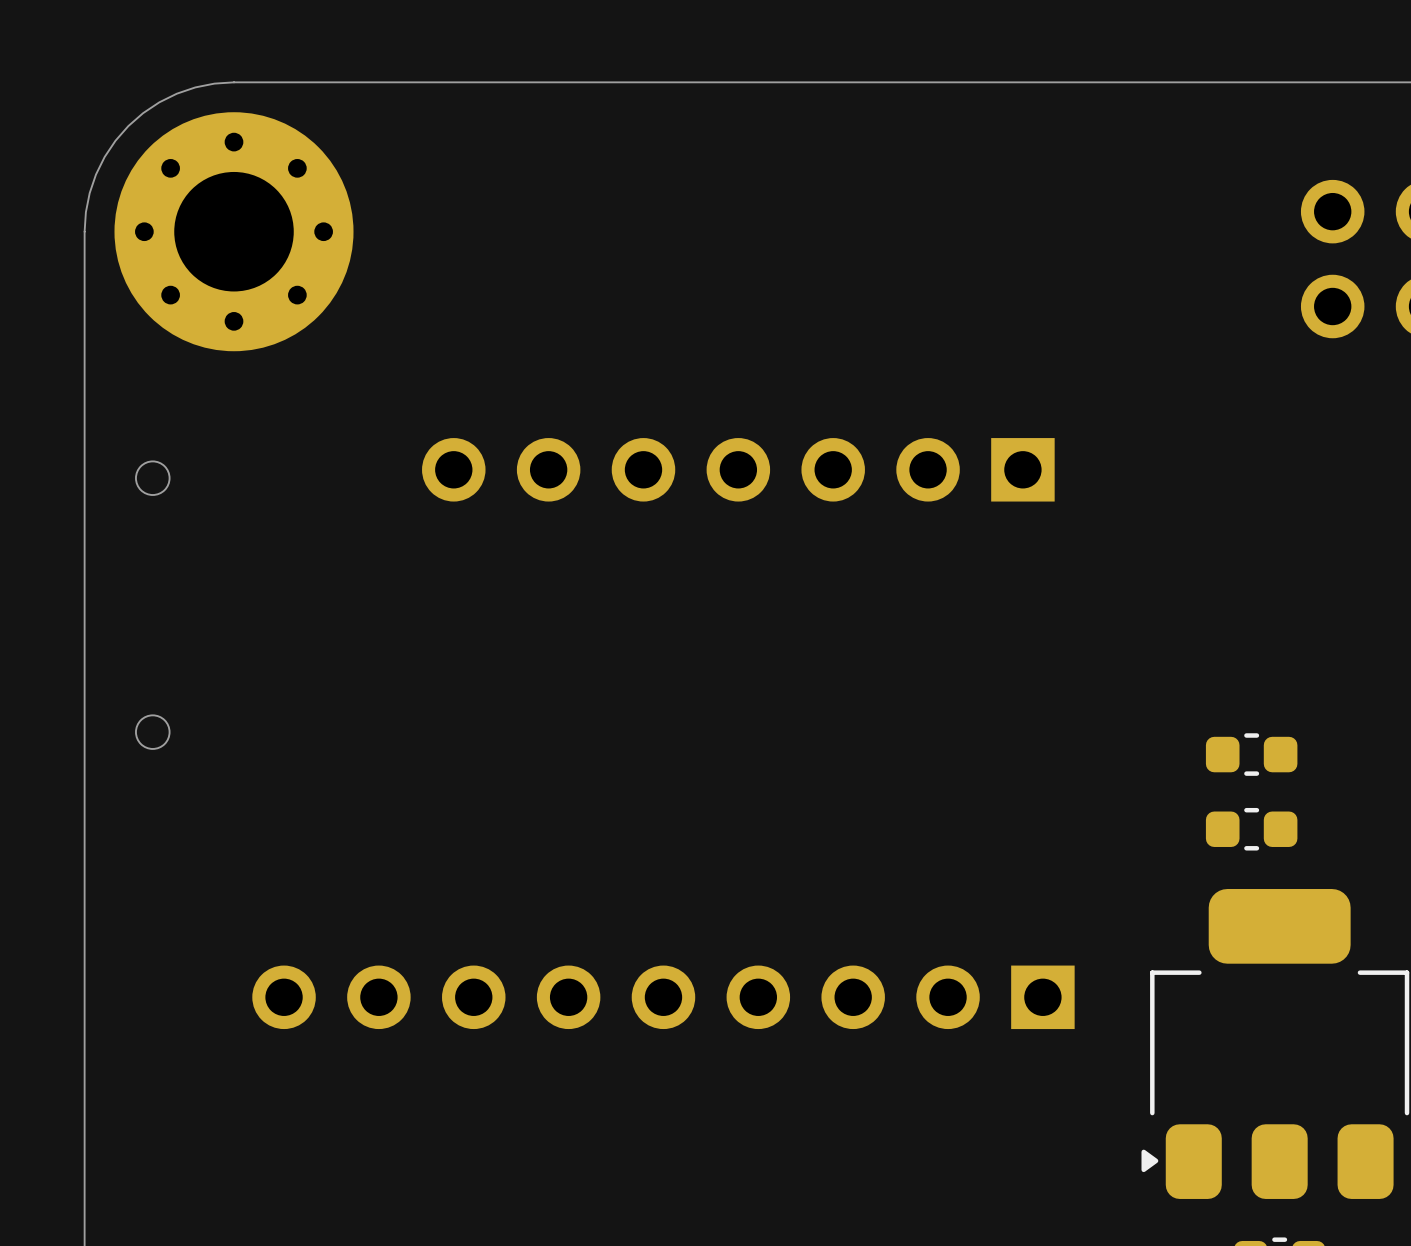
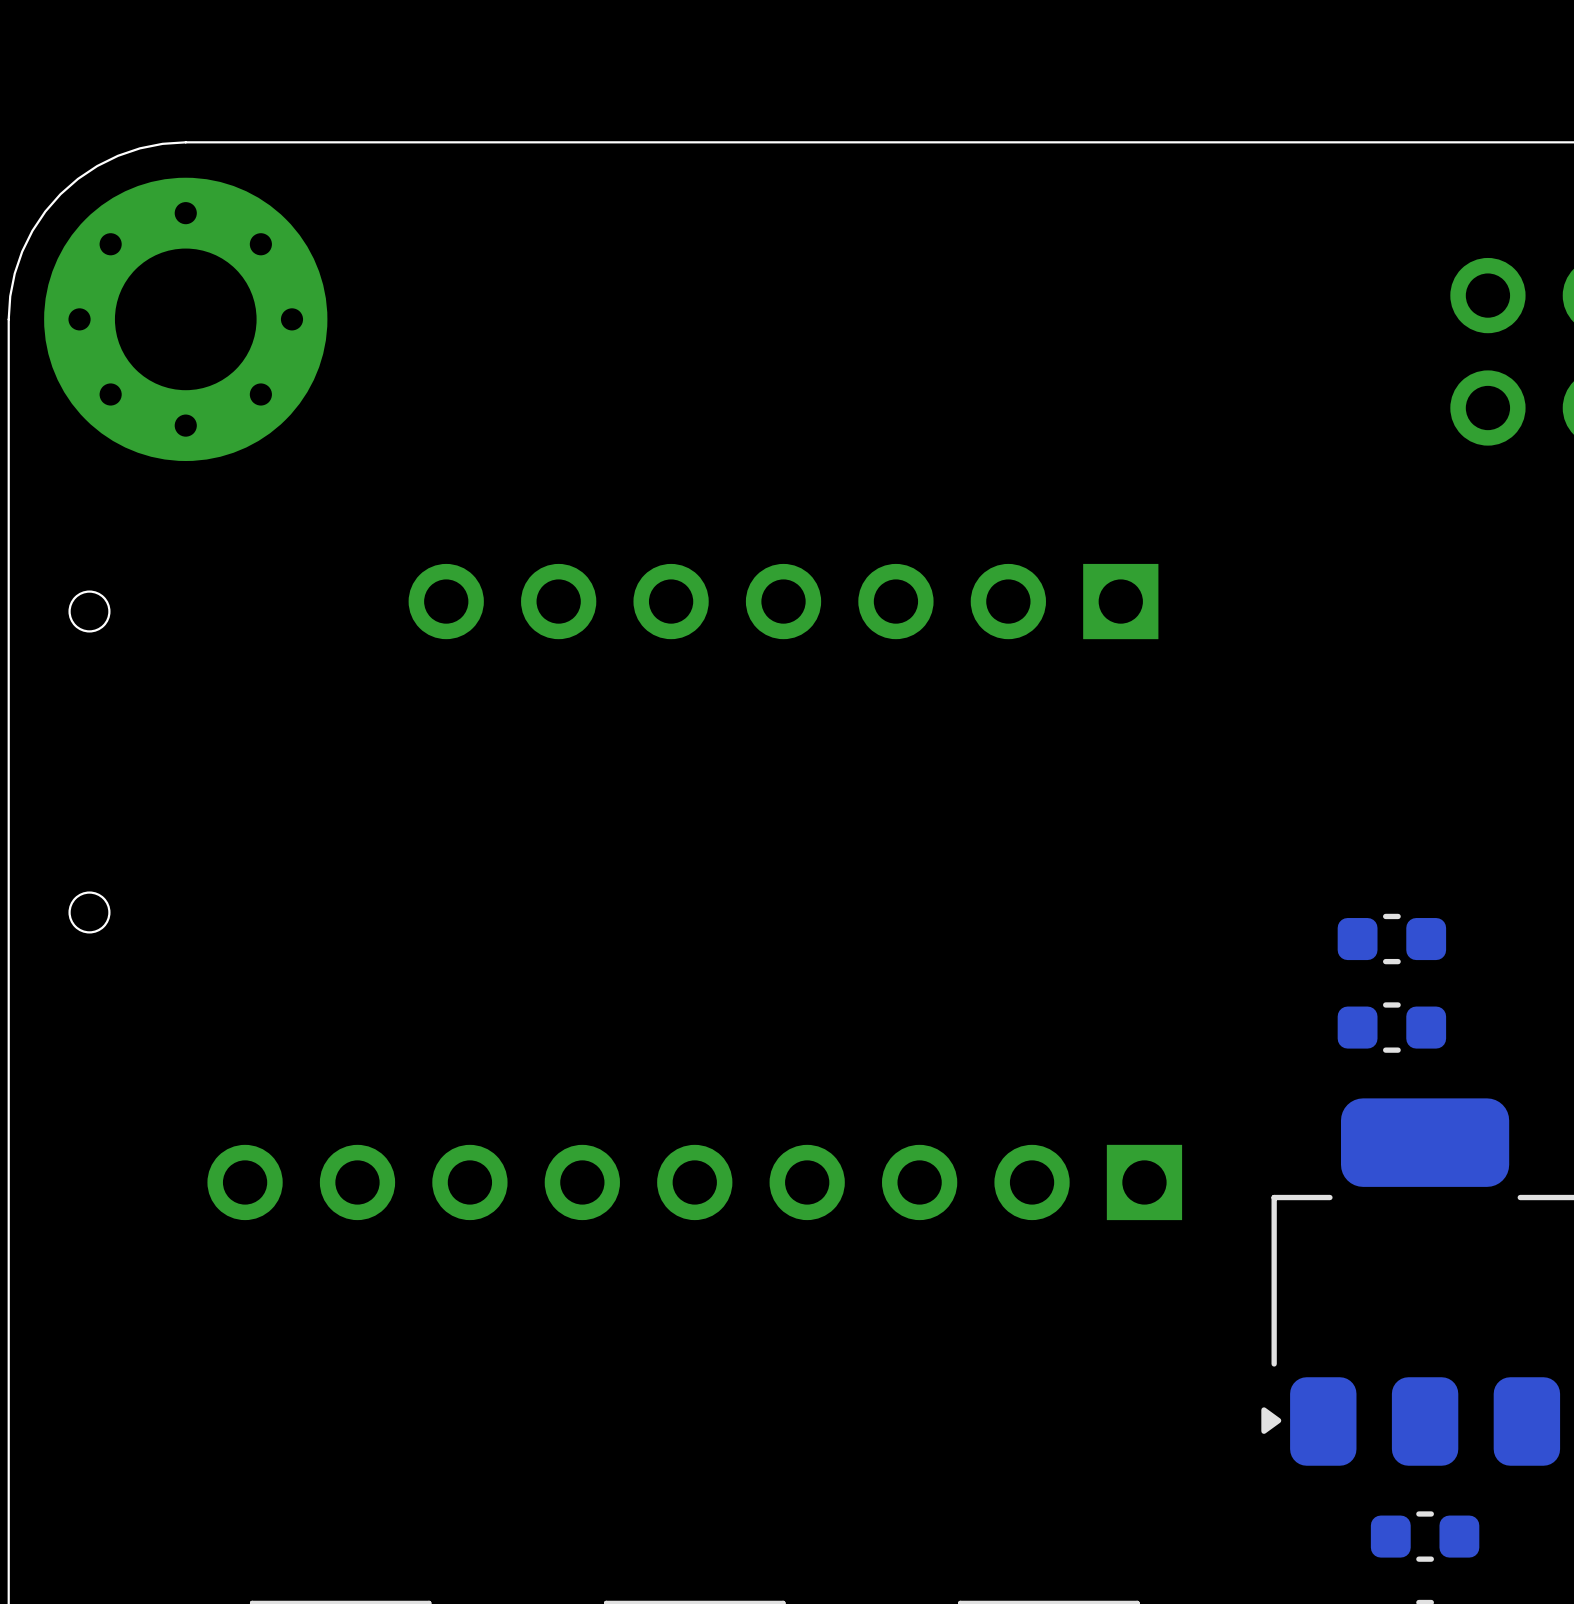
part position: (663, 997) -> (694, 1182)

